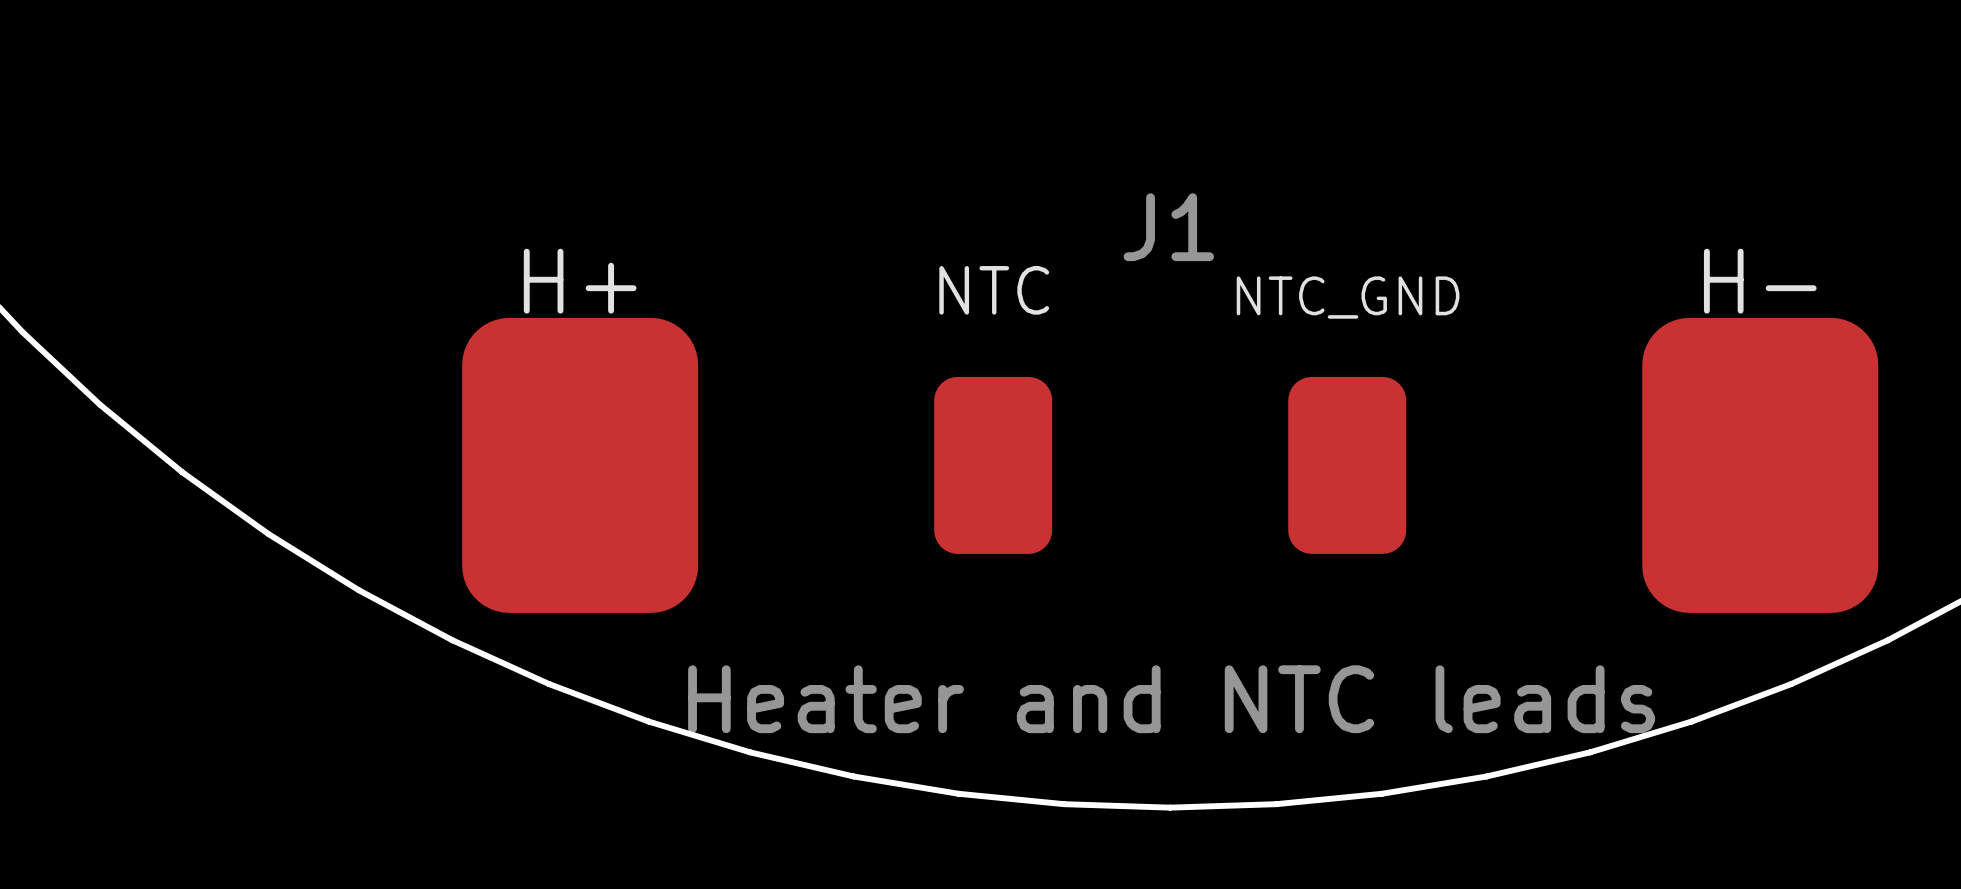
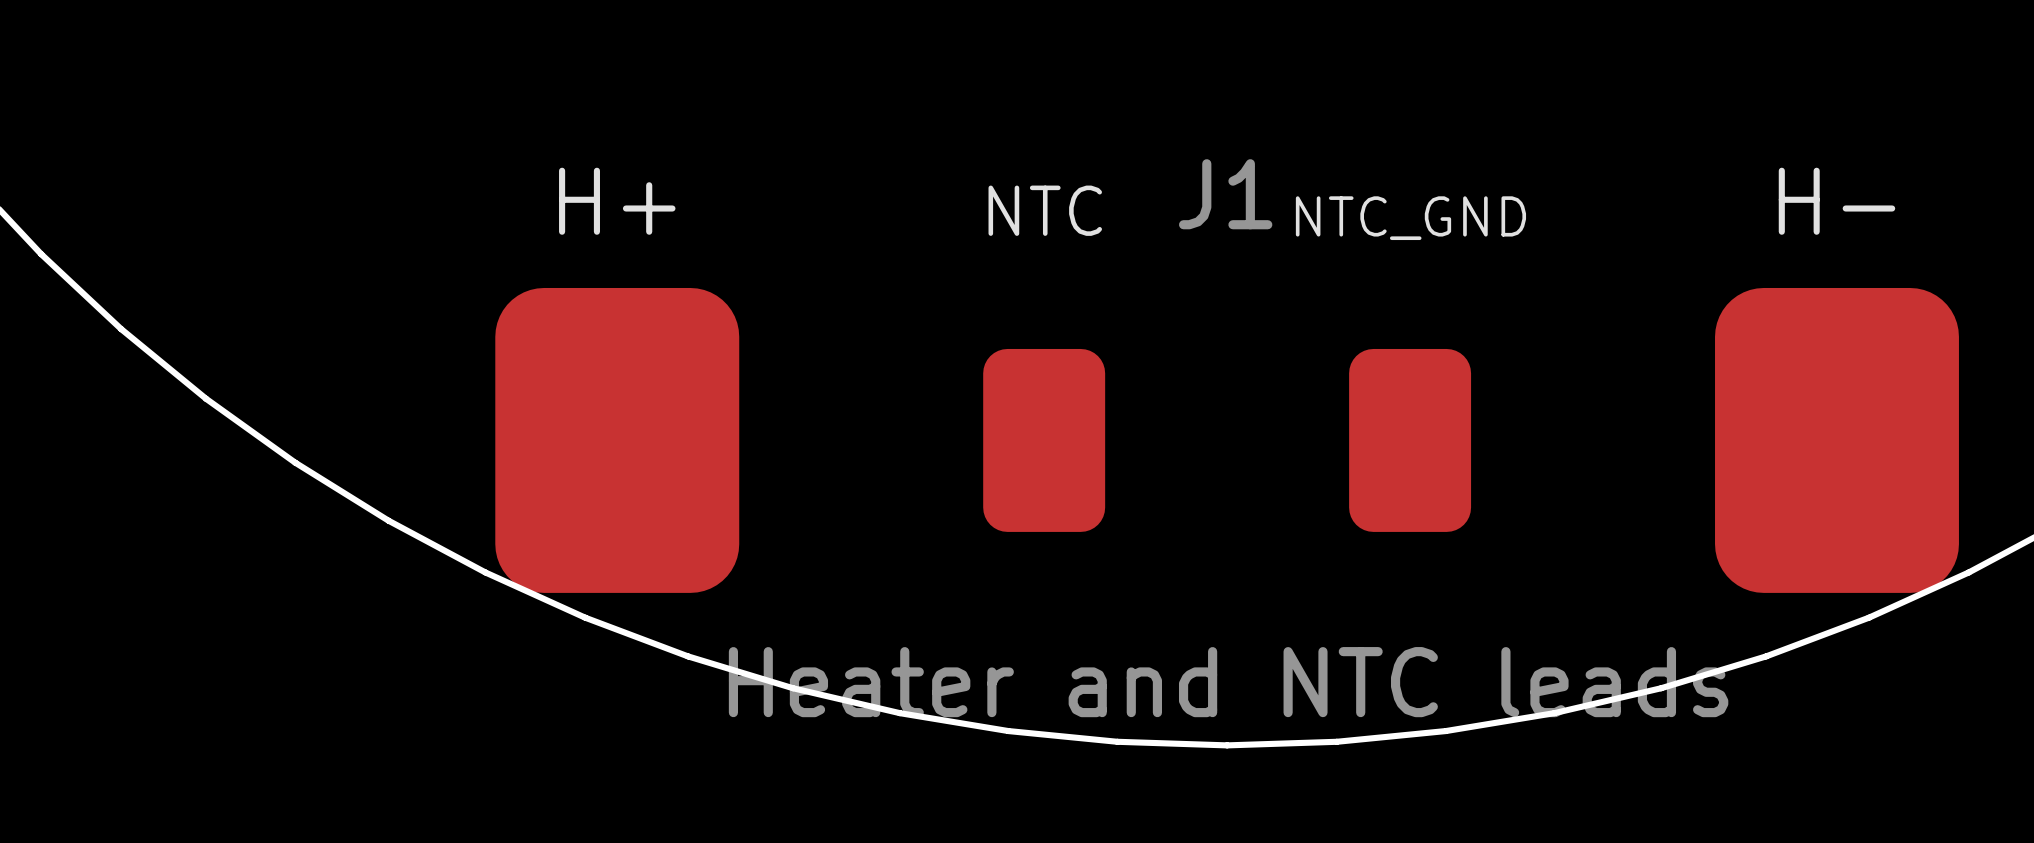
J1 position: (1170, 465) -> (1227, 440)

